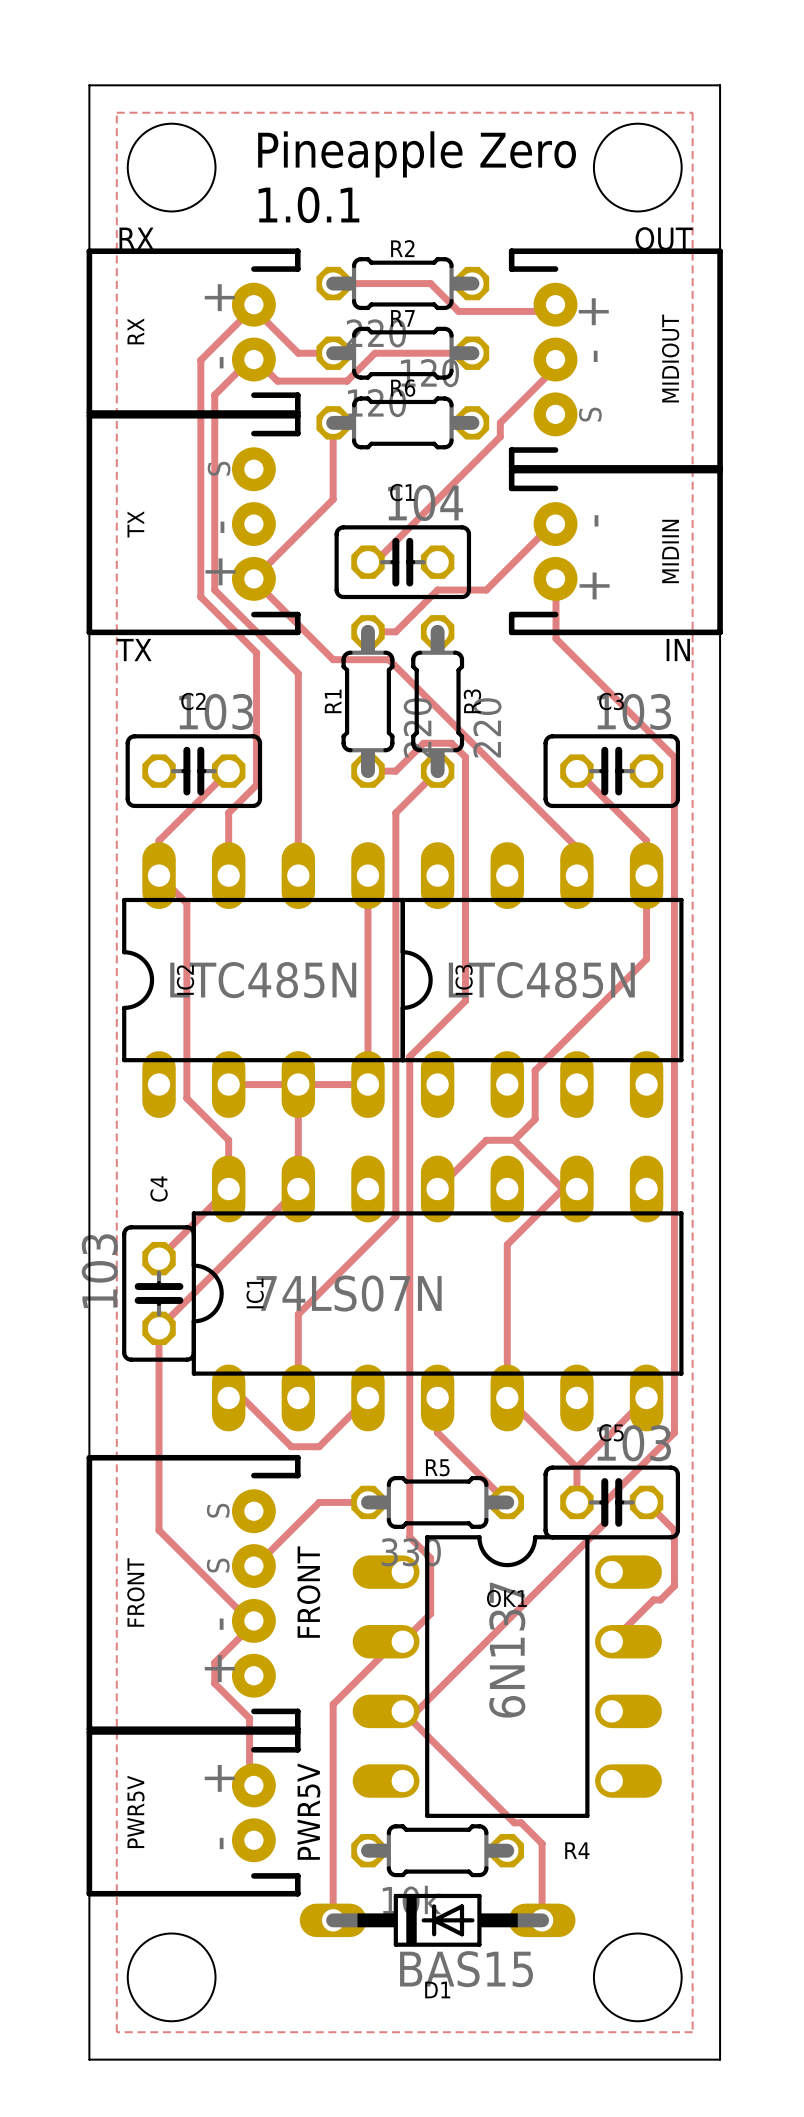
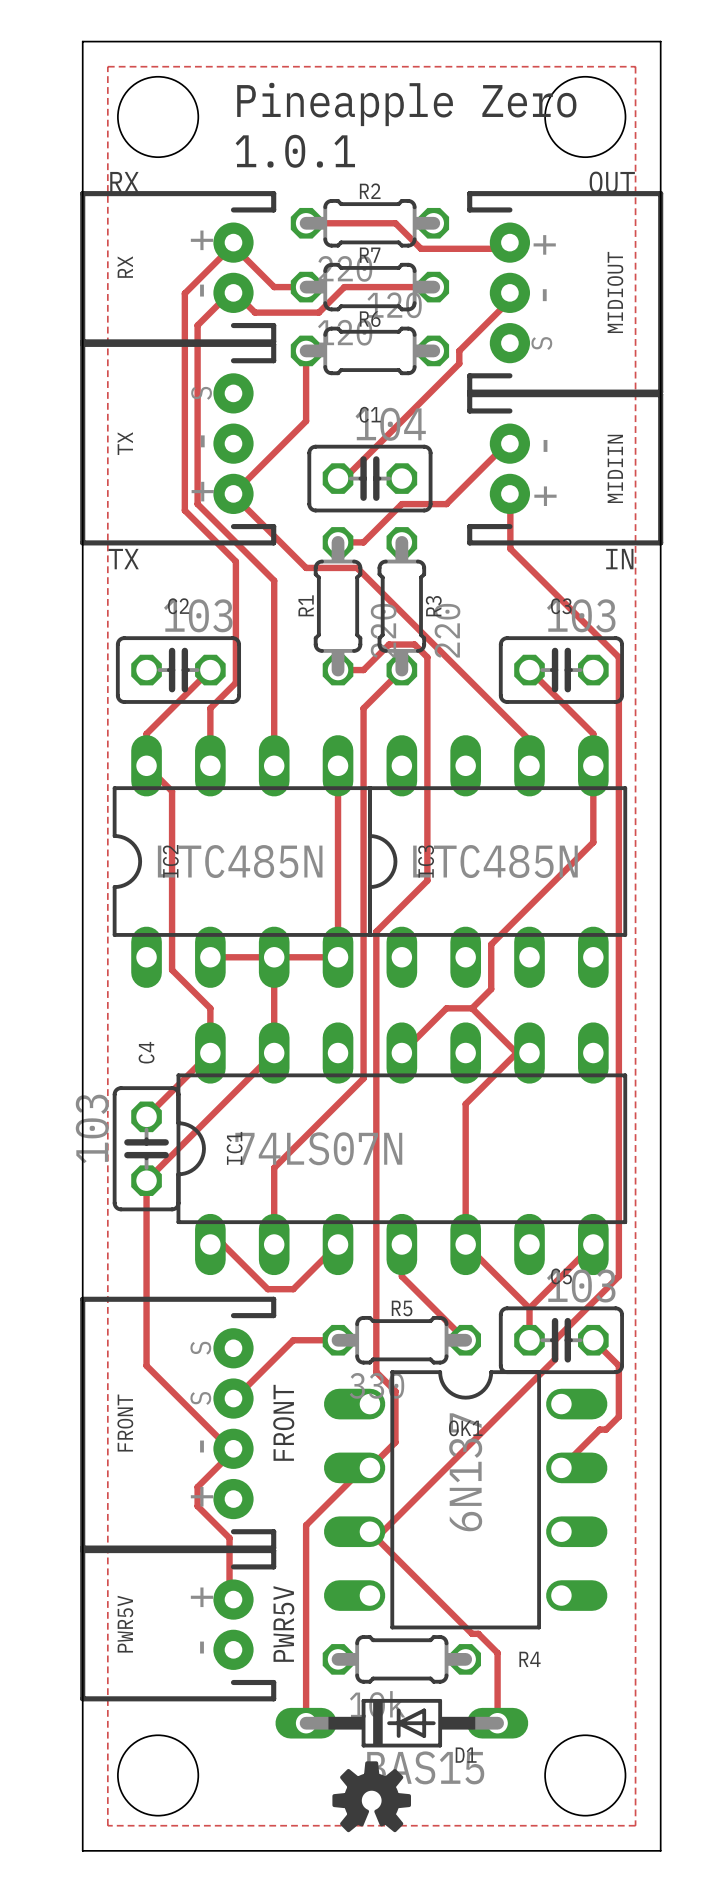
drawing: none -> [332, 1761, 411, 1833]
D1 name position: D1 (437, 1989) -> D1 (466, 1755)

